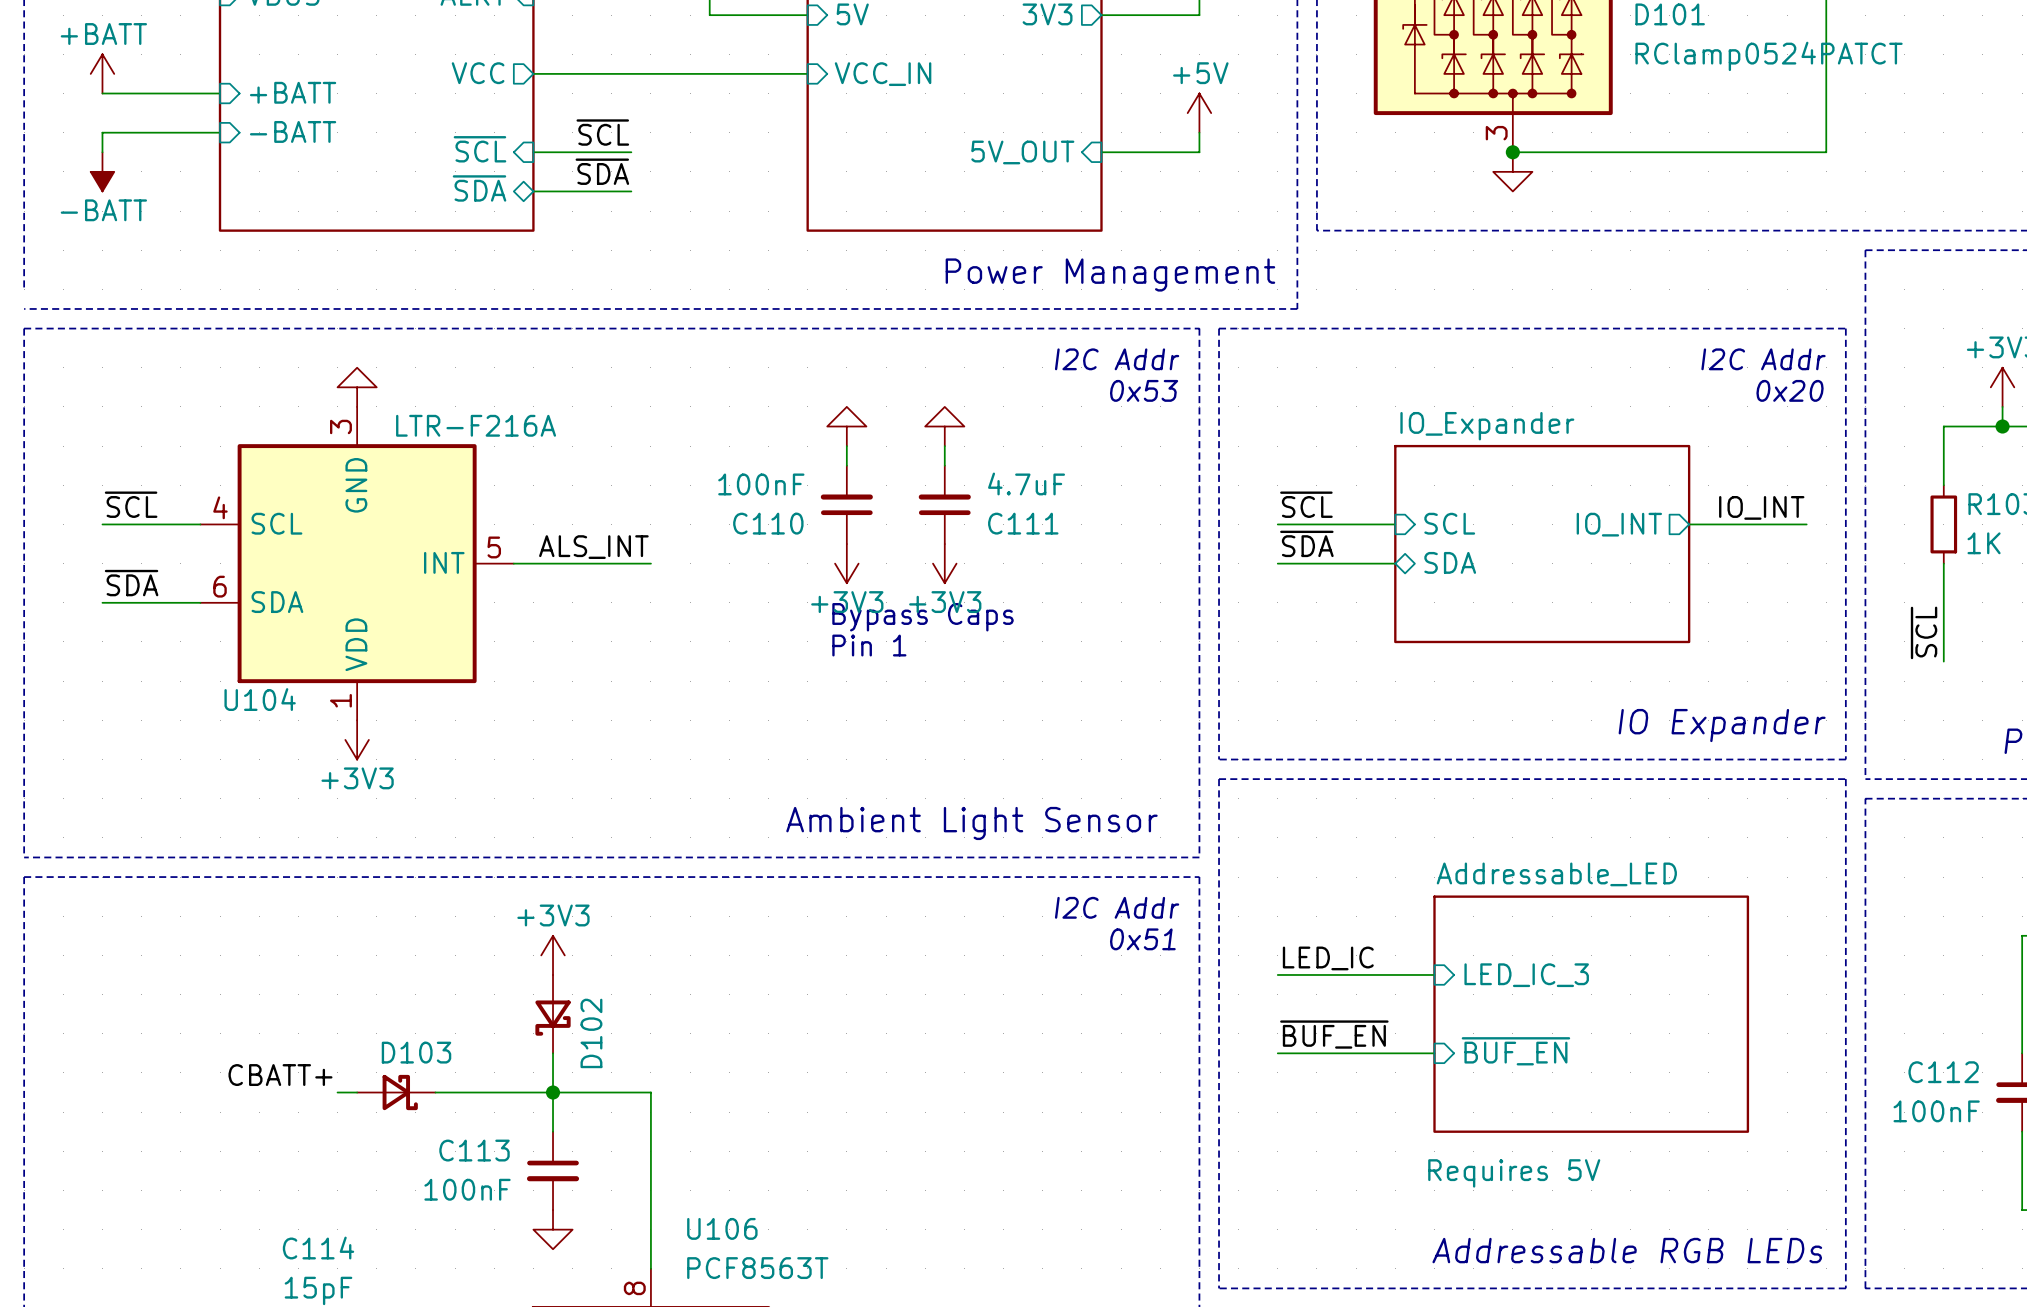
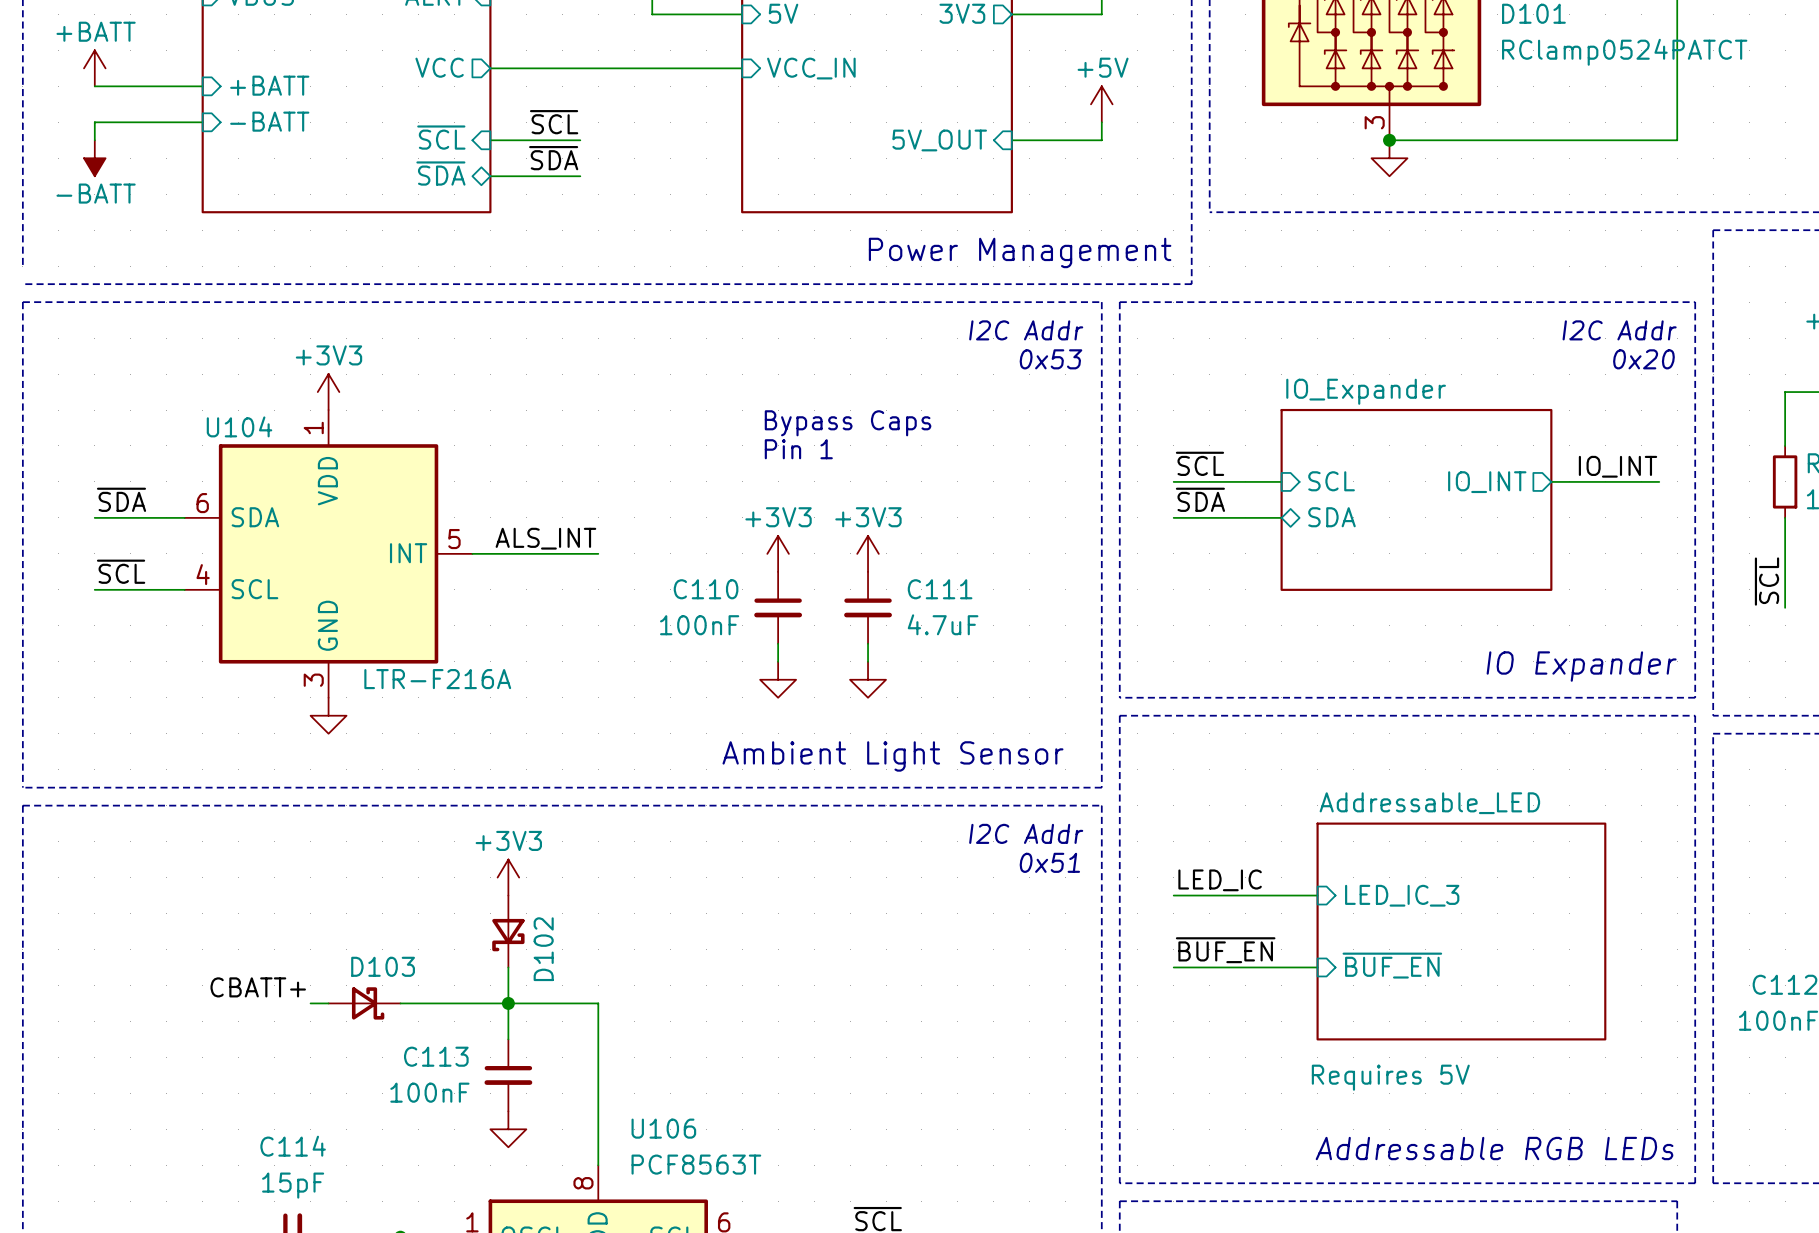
power symbol: (357, 387) -> none
power symbol: none -> +3V3 (328, 392)
power symbol: (846, 426) -> none
power symbol: (944, 426) -> none
wire: (846, 446) (846, 465) -> (778, 643) (778, 661)
wire: (944, 446) (944, 465) -> (868, 643) (868, 661)
C111 value position: 4.7uF (1026, 483) -> 4.7uF (943, 624)
C110 value position: 100nF (761, 484) -> 100nF (699, 625)
label position: ~{SCL} (131, 504) -> ~{SCL} (121, 571)
C110 rotation: 0° (846, 504) -> 180° (778, 607)
C110 position: (846, 504) -> (778, 607)
C111 rotation: 0° (944, 504) -> 180° (868, 607)
C111 position: (944, 504) -> (868, 607)
C110 name position: C110 (768, 523) -> C110 (706, 589)
C111 name position: C111 (1023, 523) -> C111 (940, 589)
wire: (102, 524) (200, 524) -> (94, 517) (184, 517)
label position: ALS_INT (593, 547) -> ALS_INT (545, 538)
U104 flip: as is (357, 563) -> up-down (328, 553)
wire: (513, 563) (650, 563) -> (472, 553) (598, 553)
power symbol rotation: 0° (846, 563) -> 180° (778, 553)
power symbol position: +3V3 (846, 563) -> +3V3 (778, 553)
power symbol rotation: 0° (944, 563) -> 180° (868, 553)
power symbol position: +3V3 (944, 563) -> +3V3 (868, 553)
label position: ~{SDA} (131, 583) -> ~{SDA} (121, 499)
wire: (102, 602) (200, 602) -> (94, 589) (184, 589)
text position: Bypass Caps (923, 617) -> Bypass Caps (848, 423)
text position: Pin 1 (869, 645) -> Pin 1 (798, 449)
power symbol: +3V3 (357, 739) -> none
power symbol: none -> (778, 679)
power symbol: none -> (868, 679)
power symbol: none -> (328, 715)

